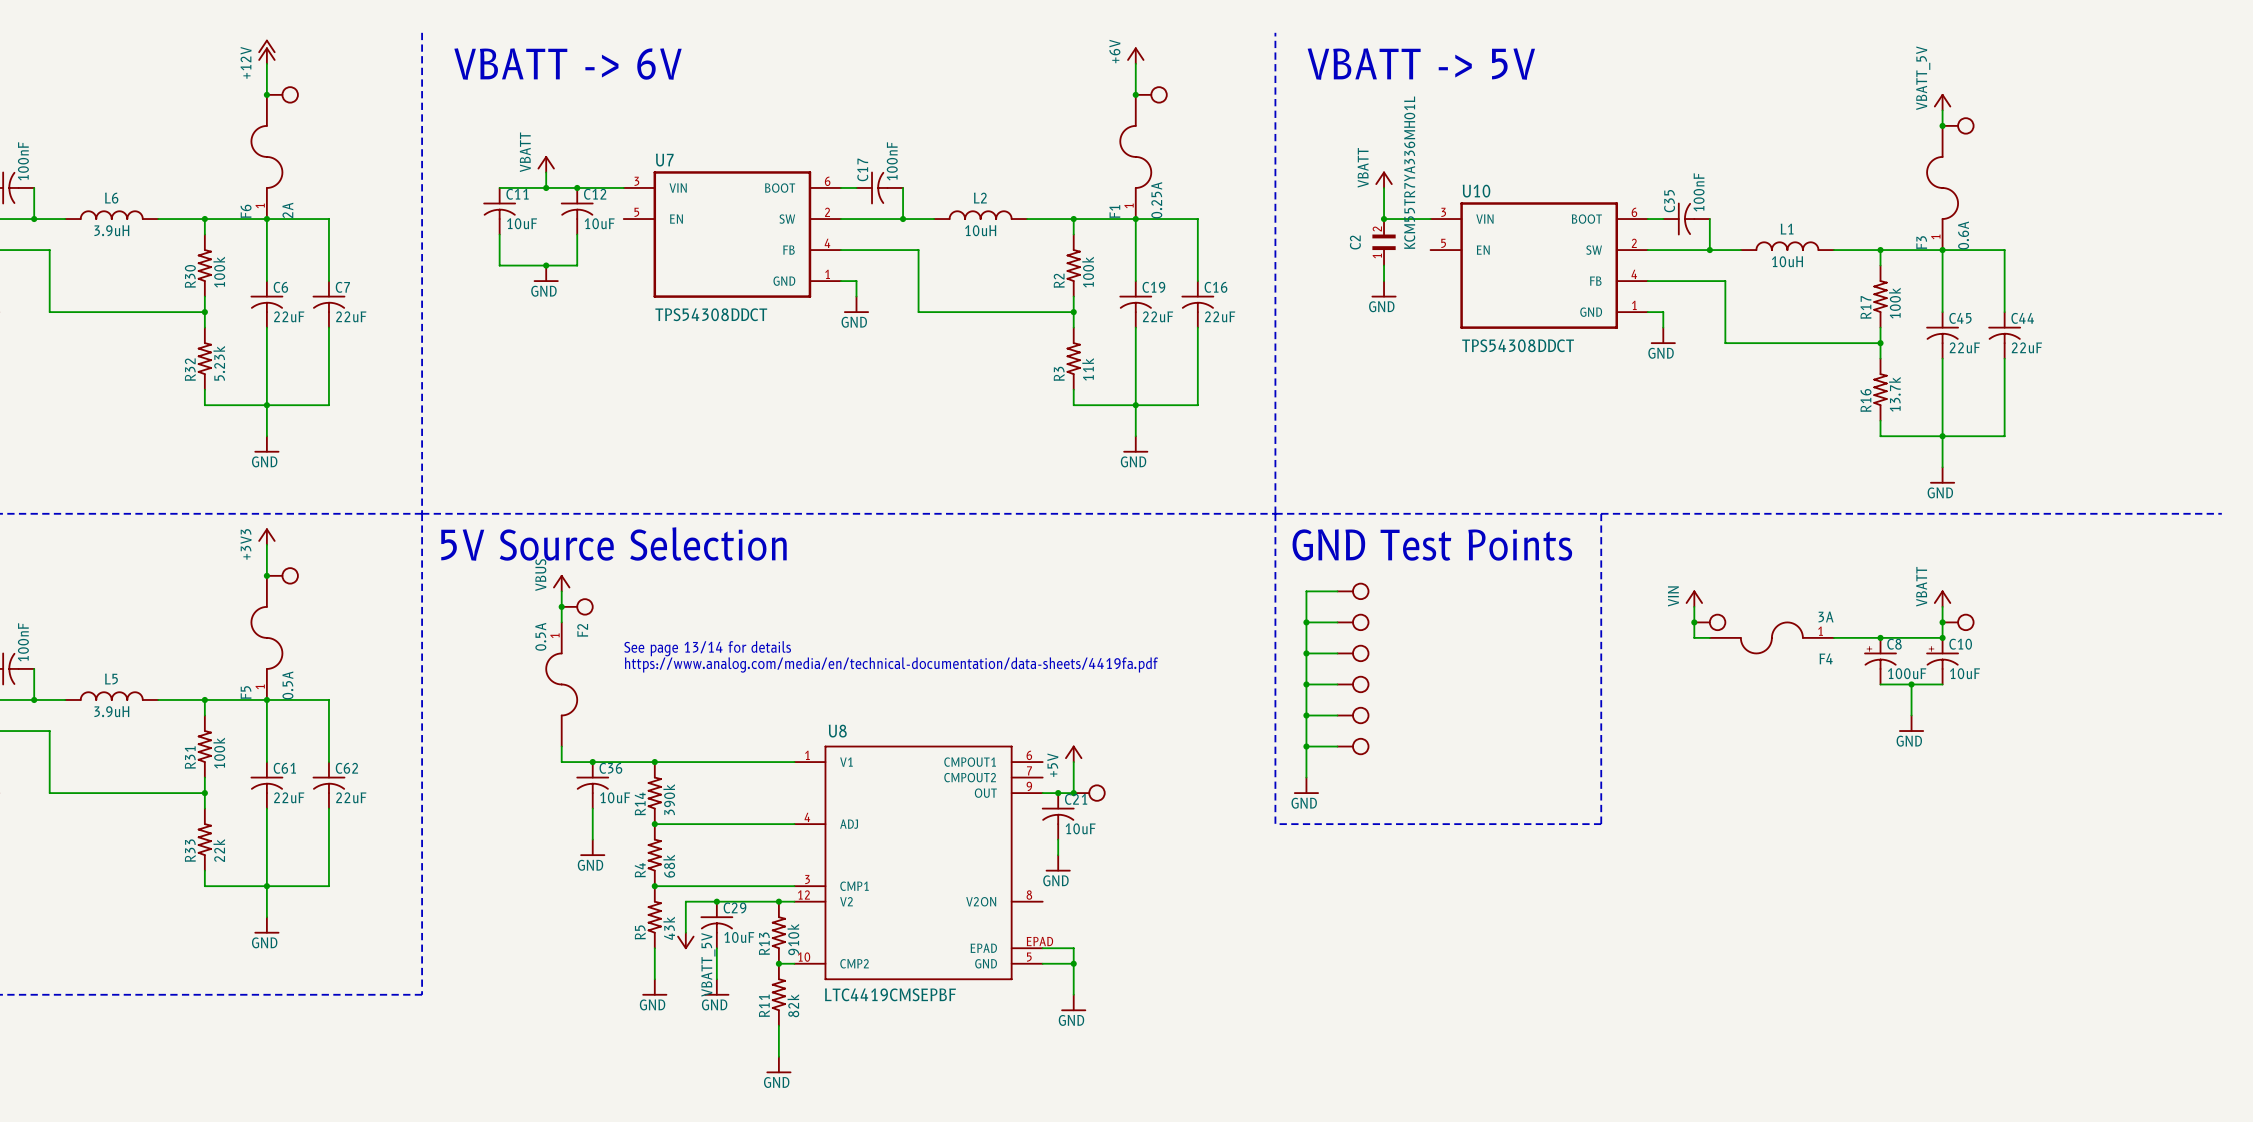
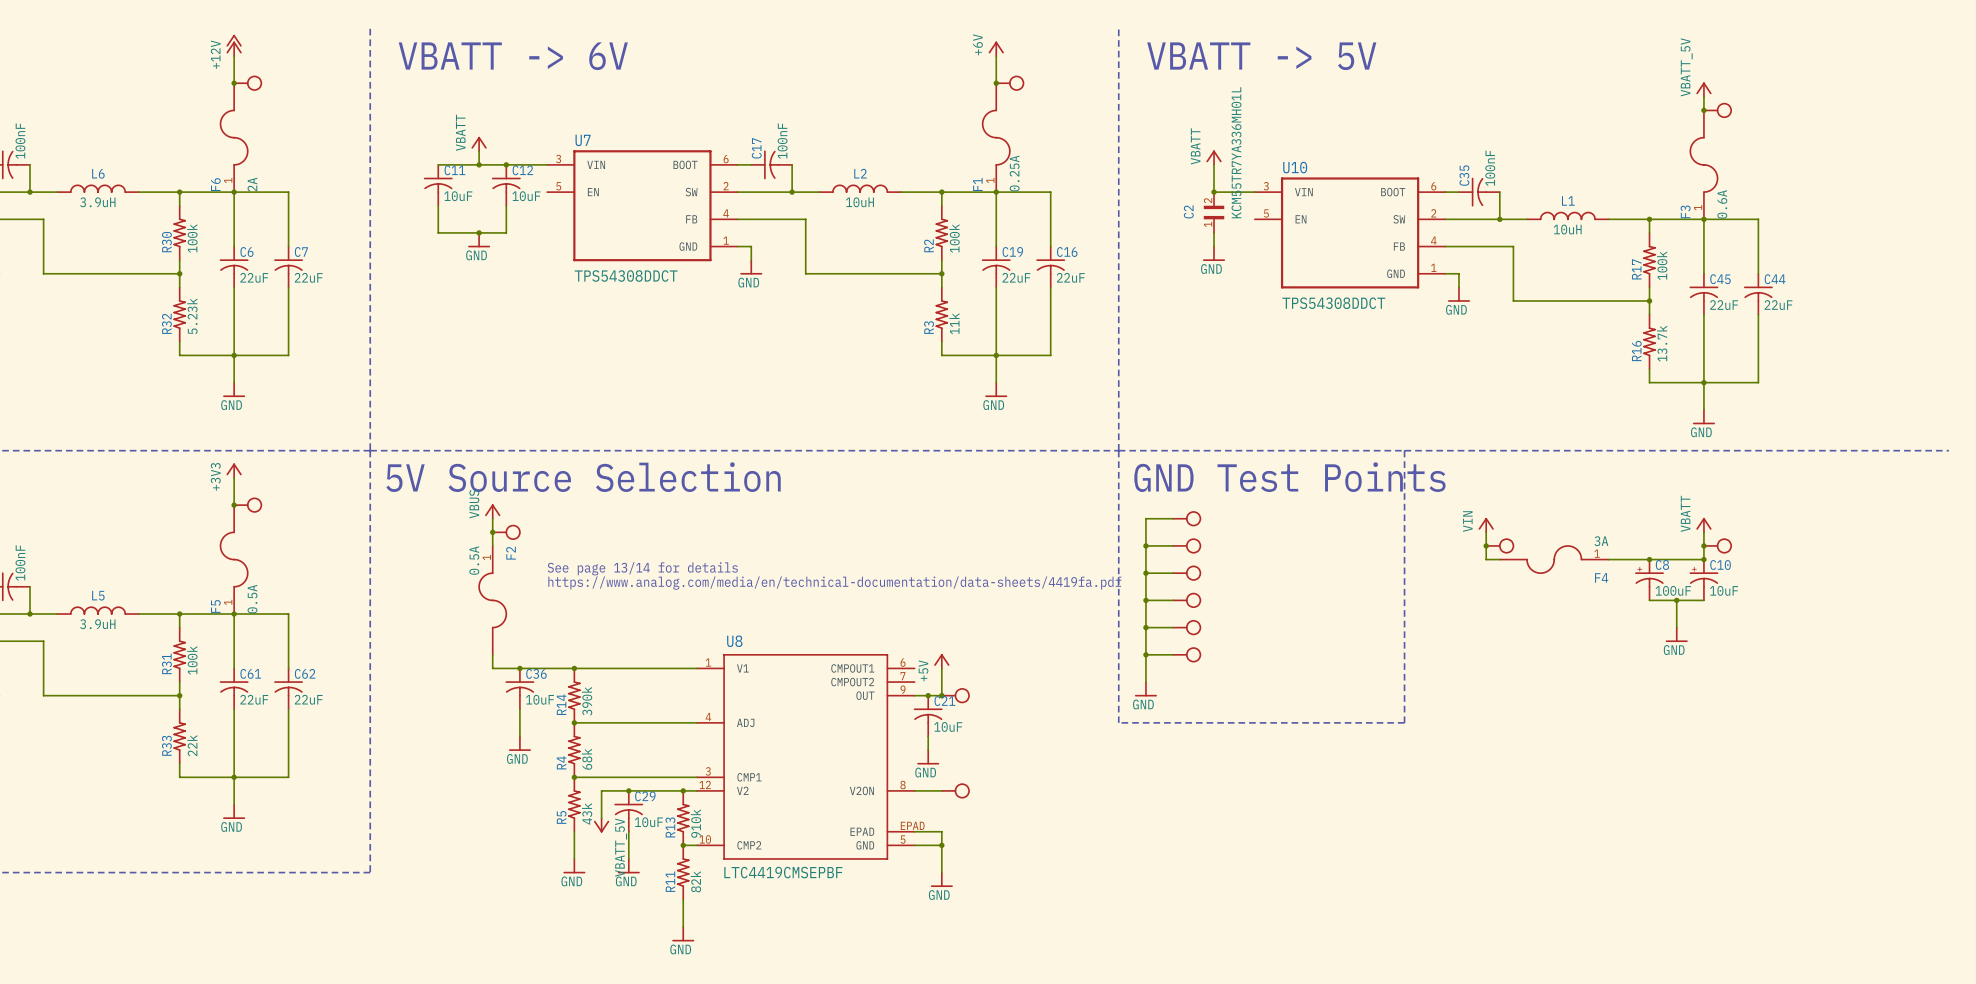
wire: none -> (914, 790) (941, 790)
part: none -> (955, 790)

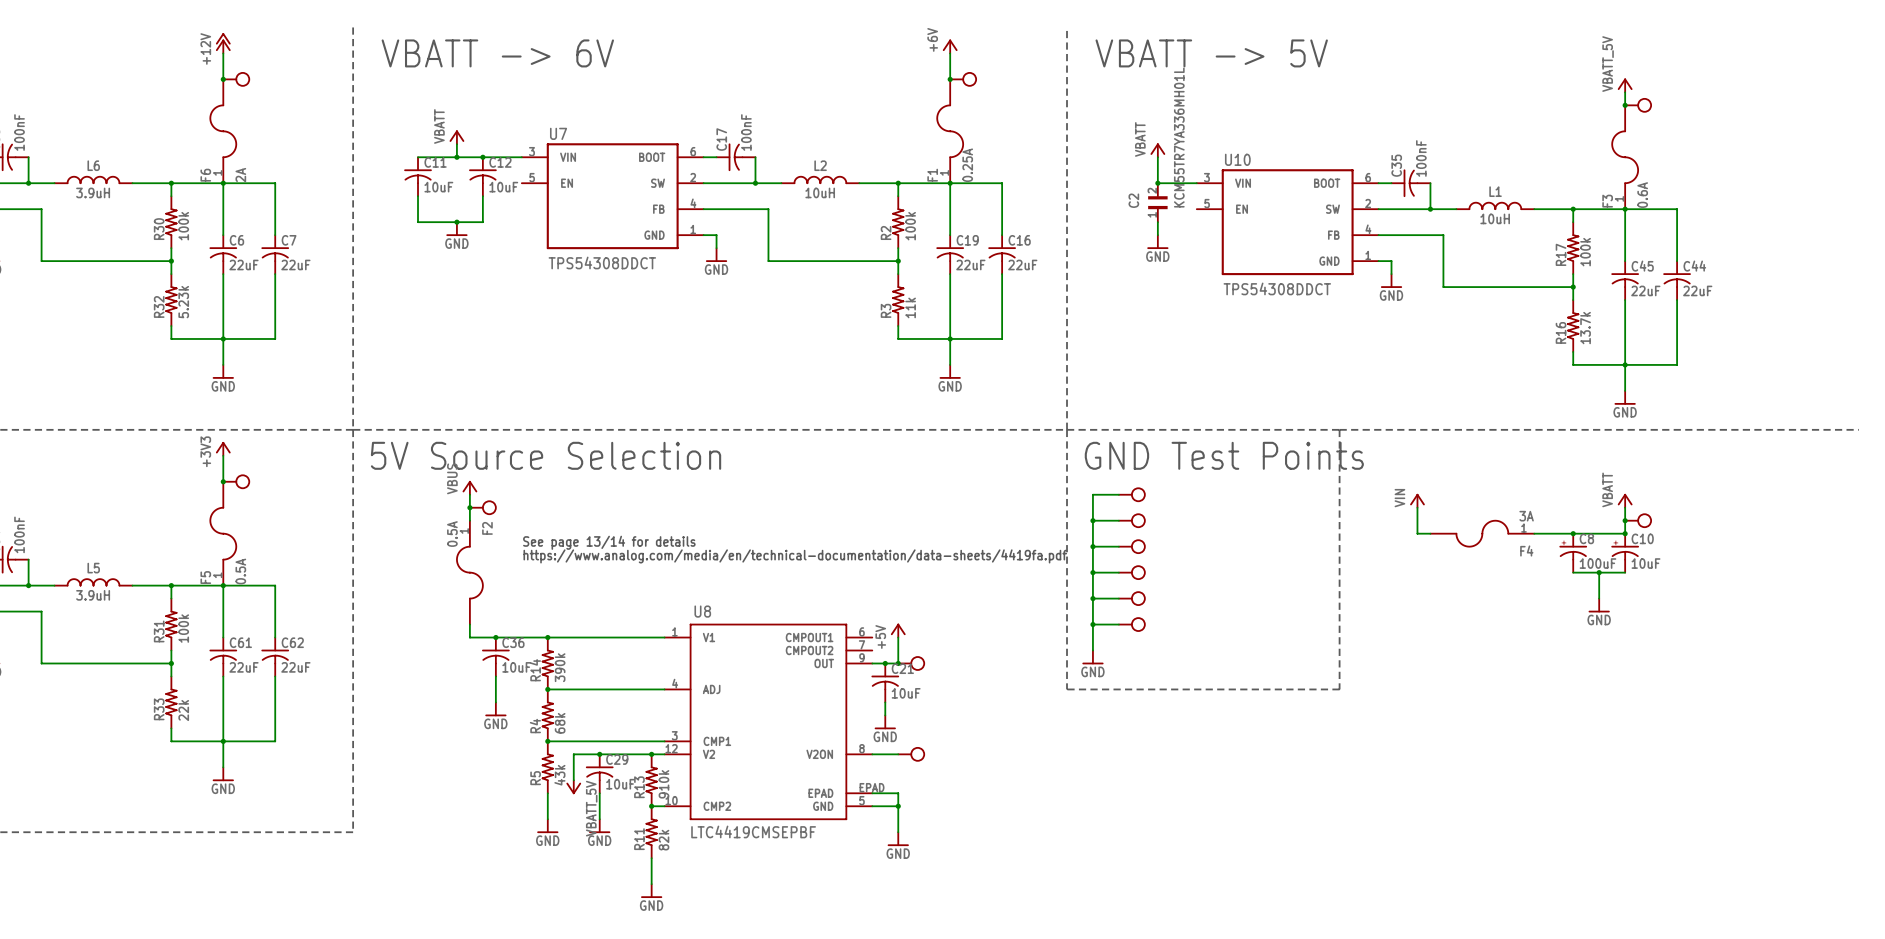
junction: (1486, 545) -> none
part: (1500, 545) -> none

